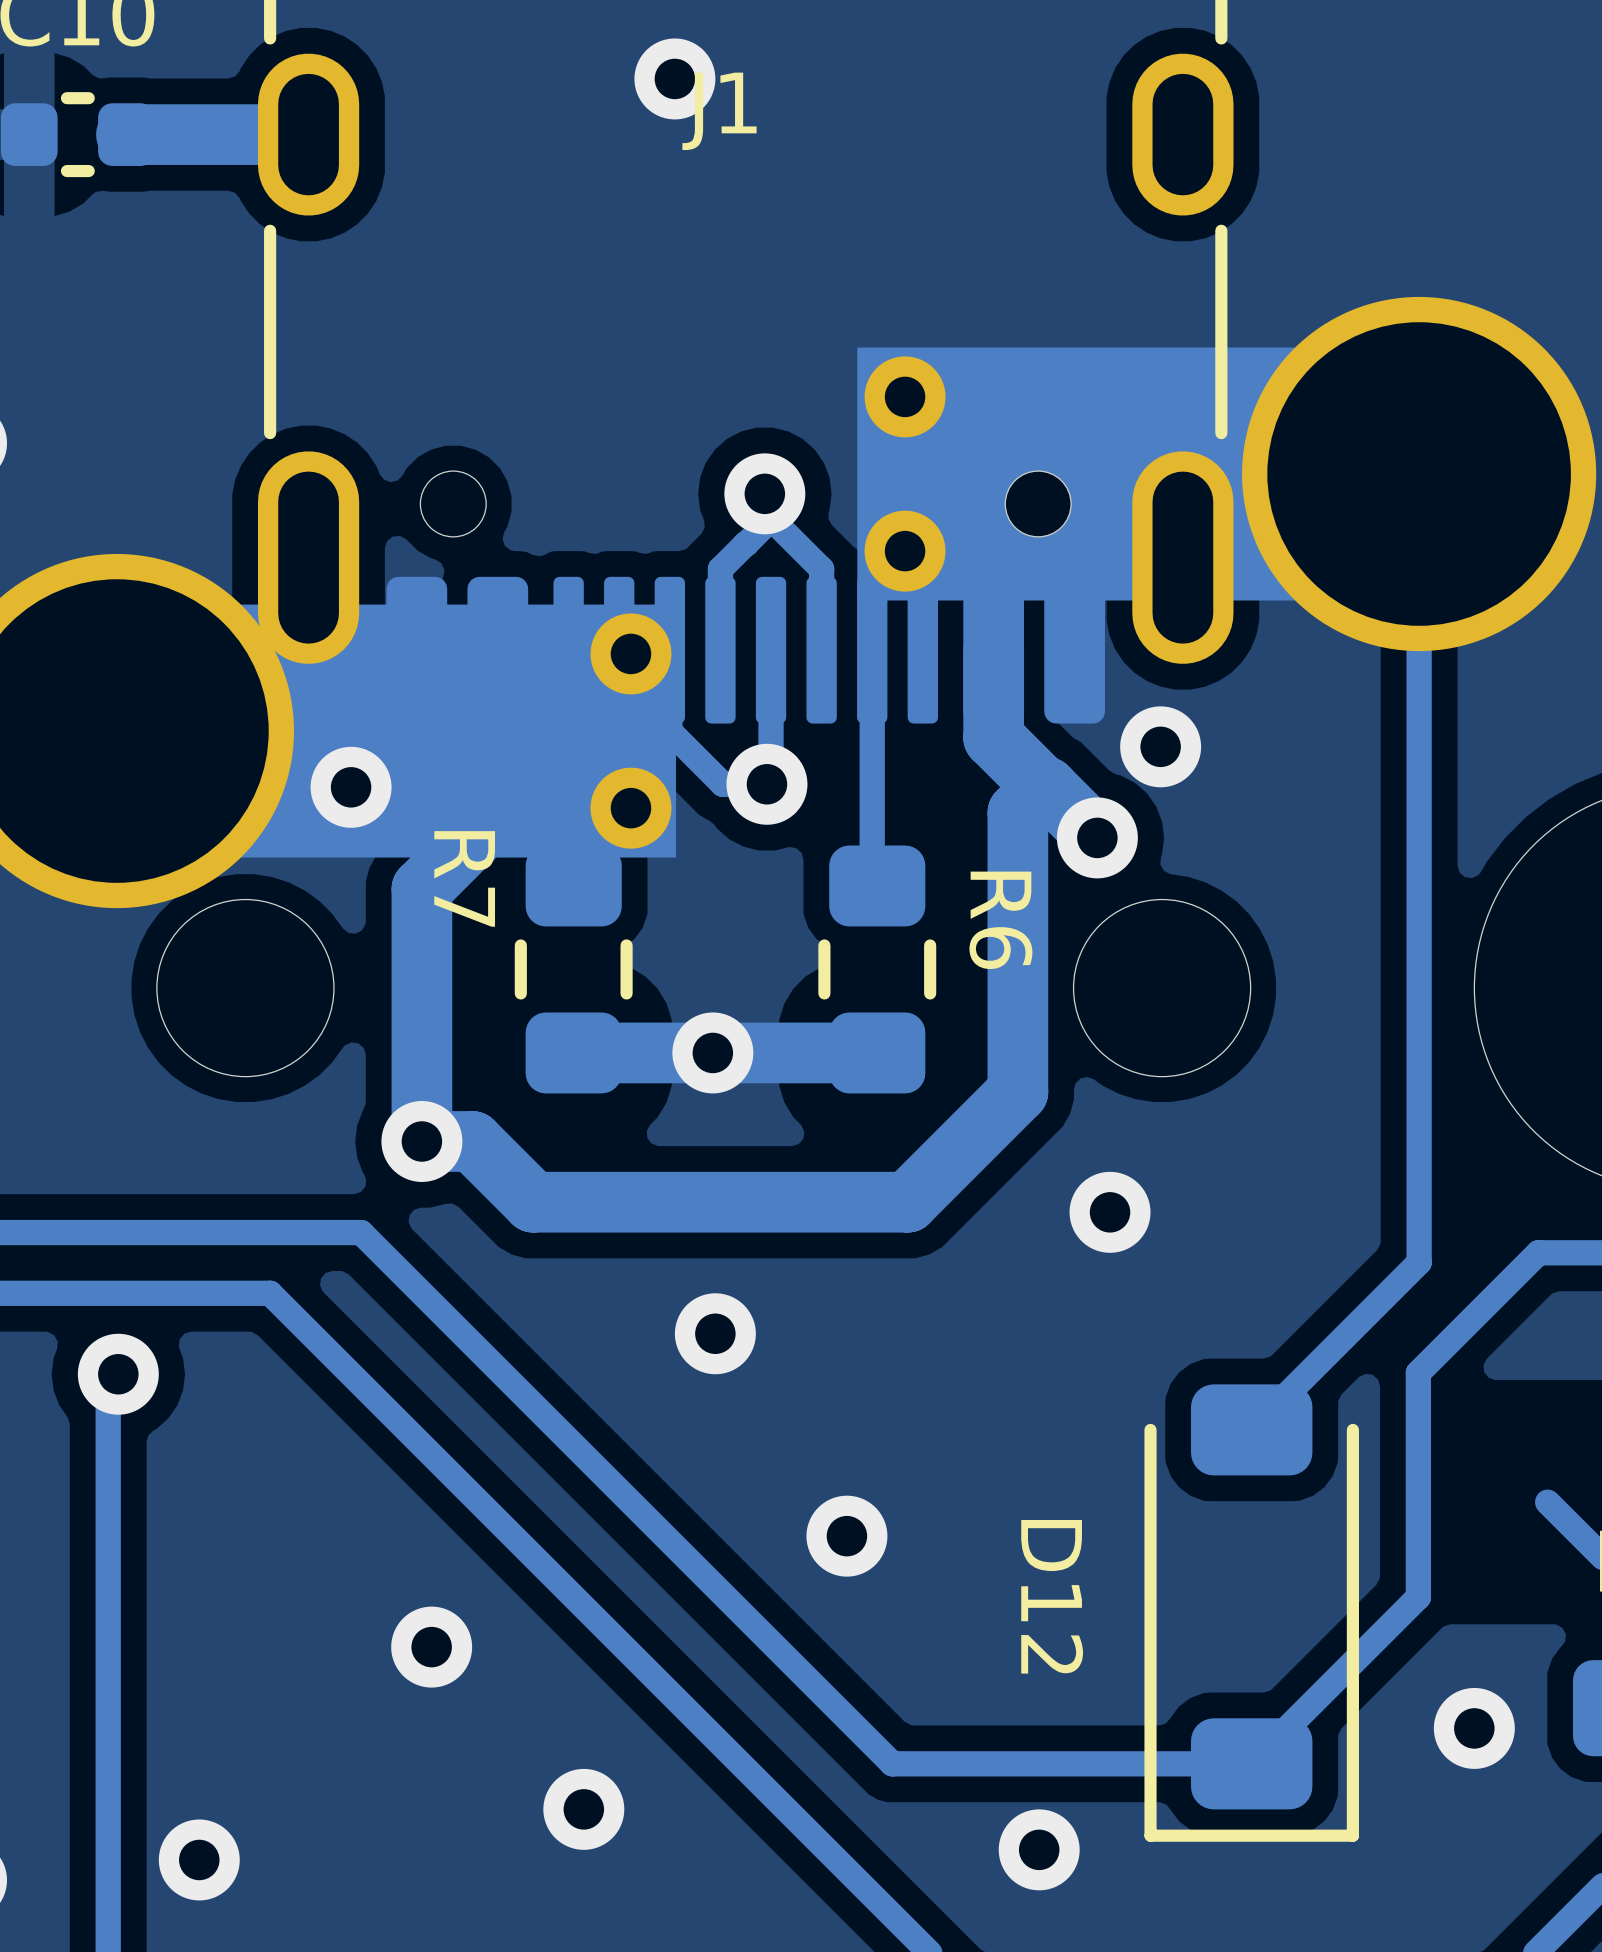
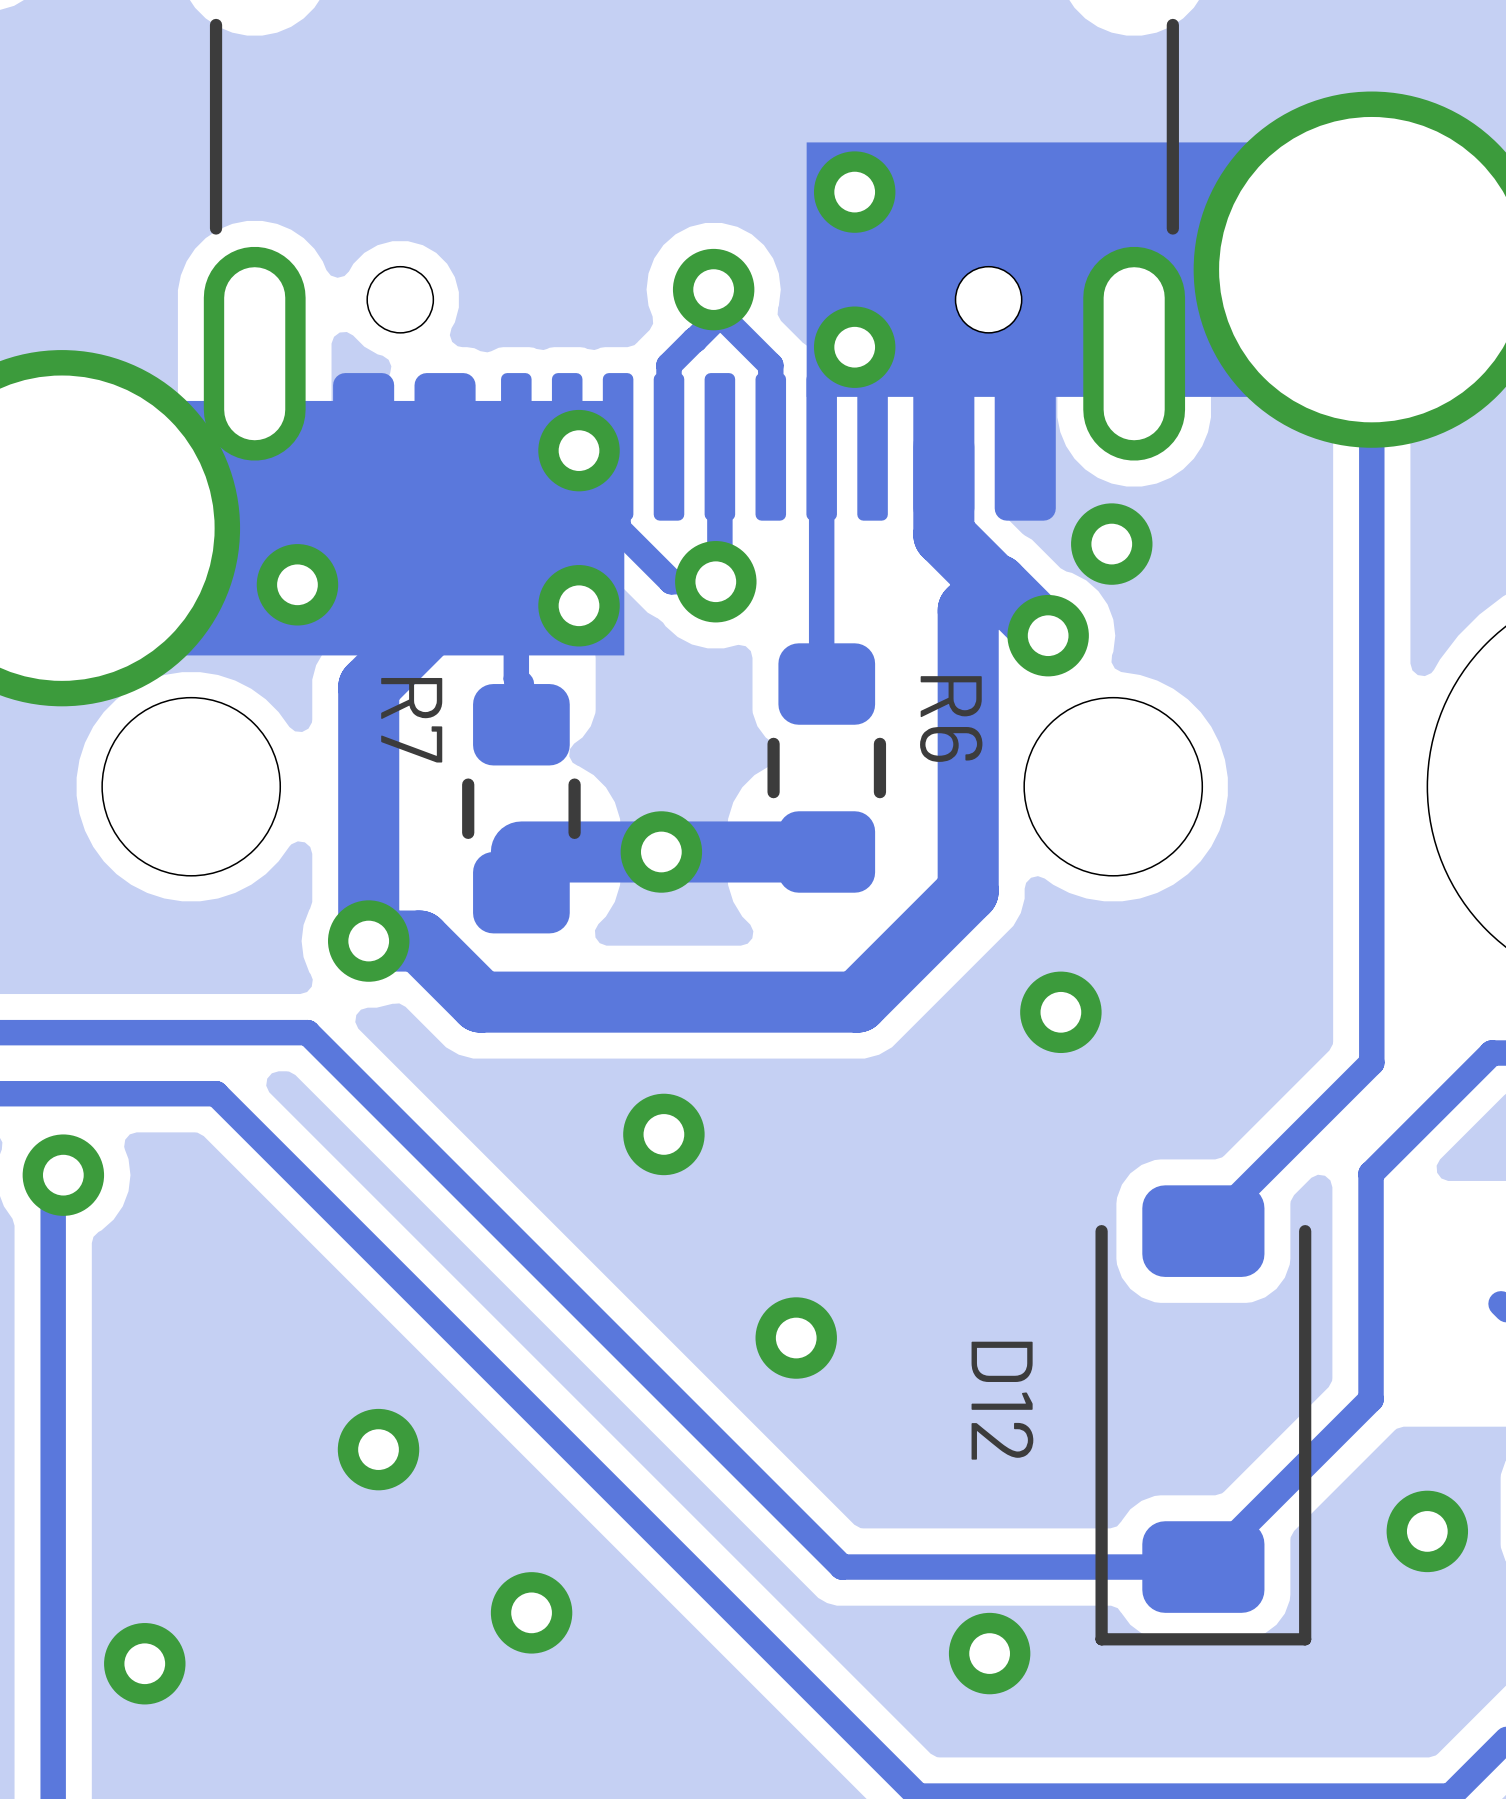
R7 position: (573, 969) -> (521, 808)

